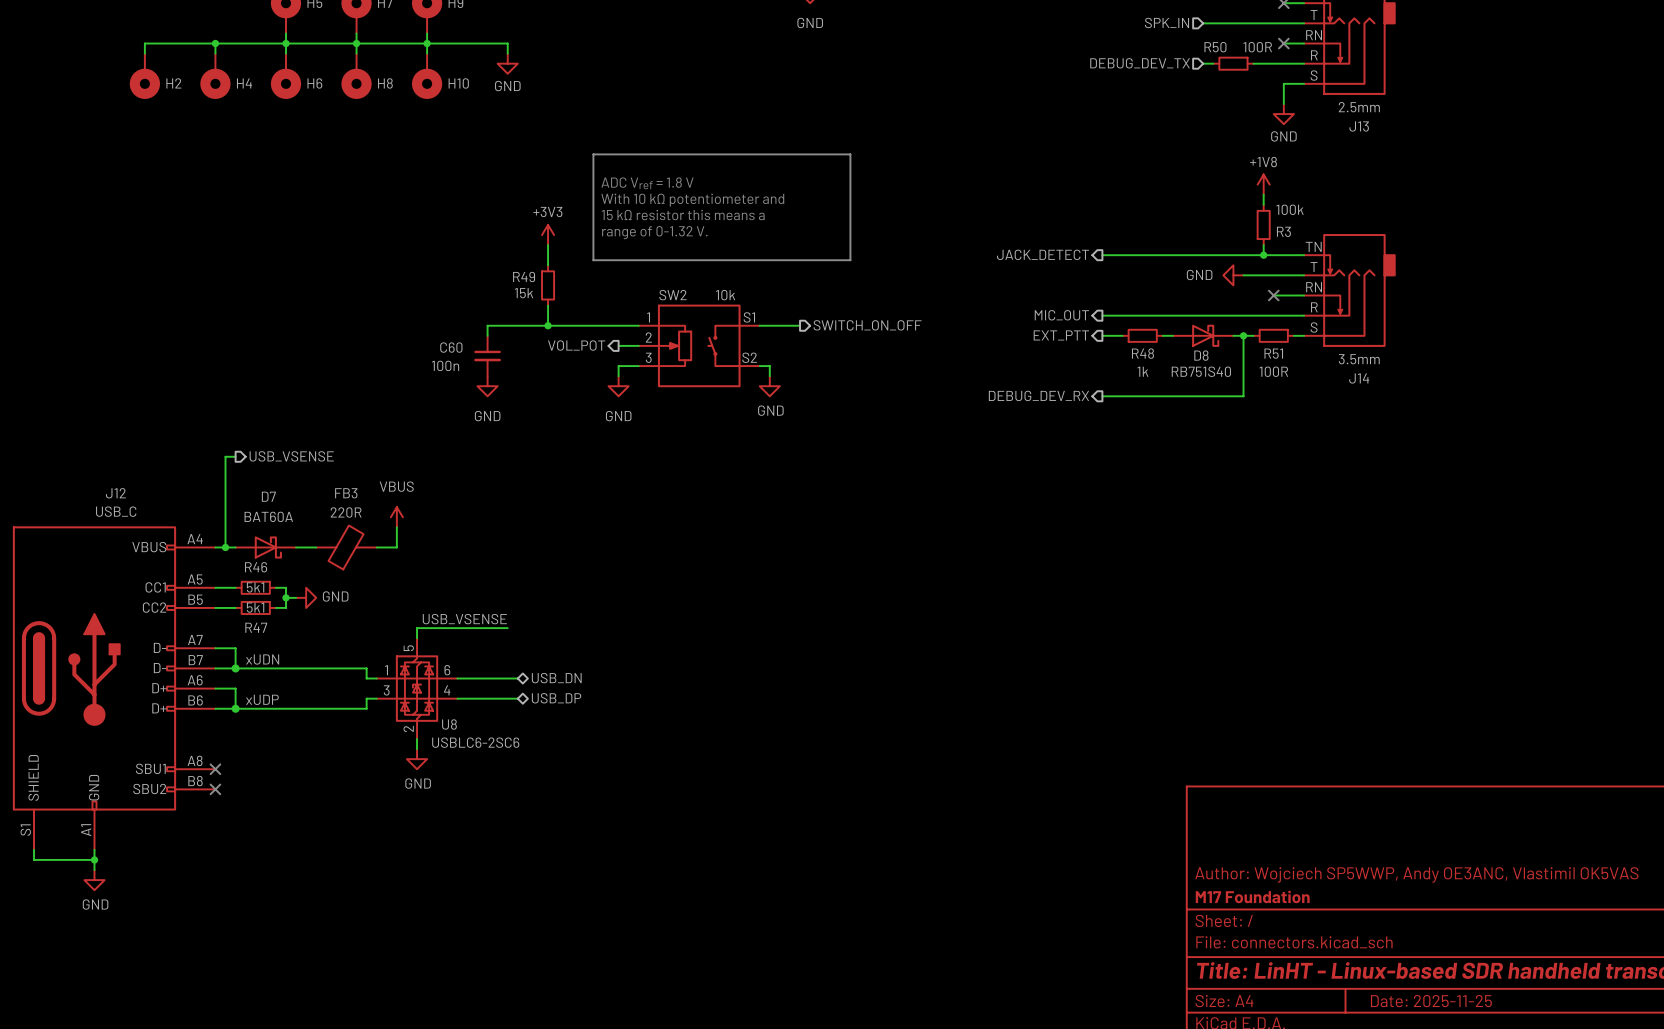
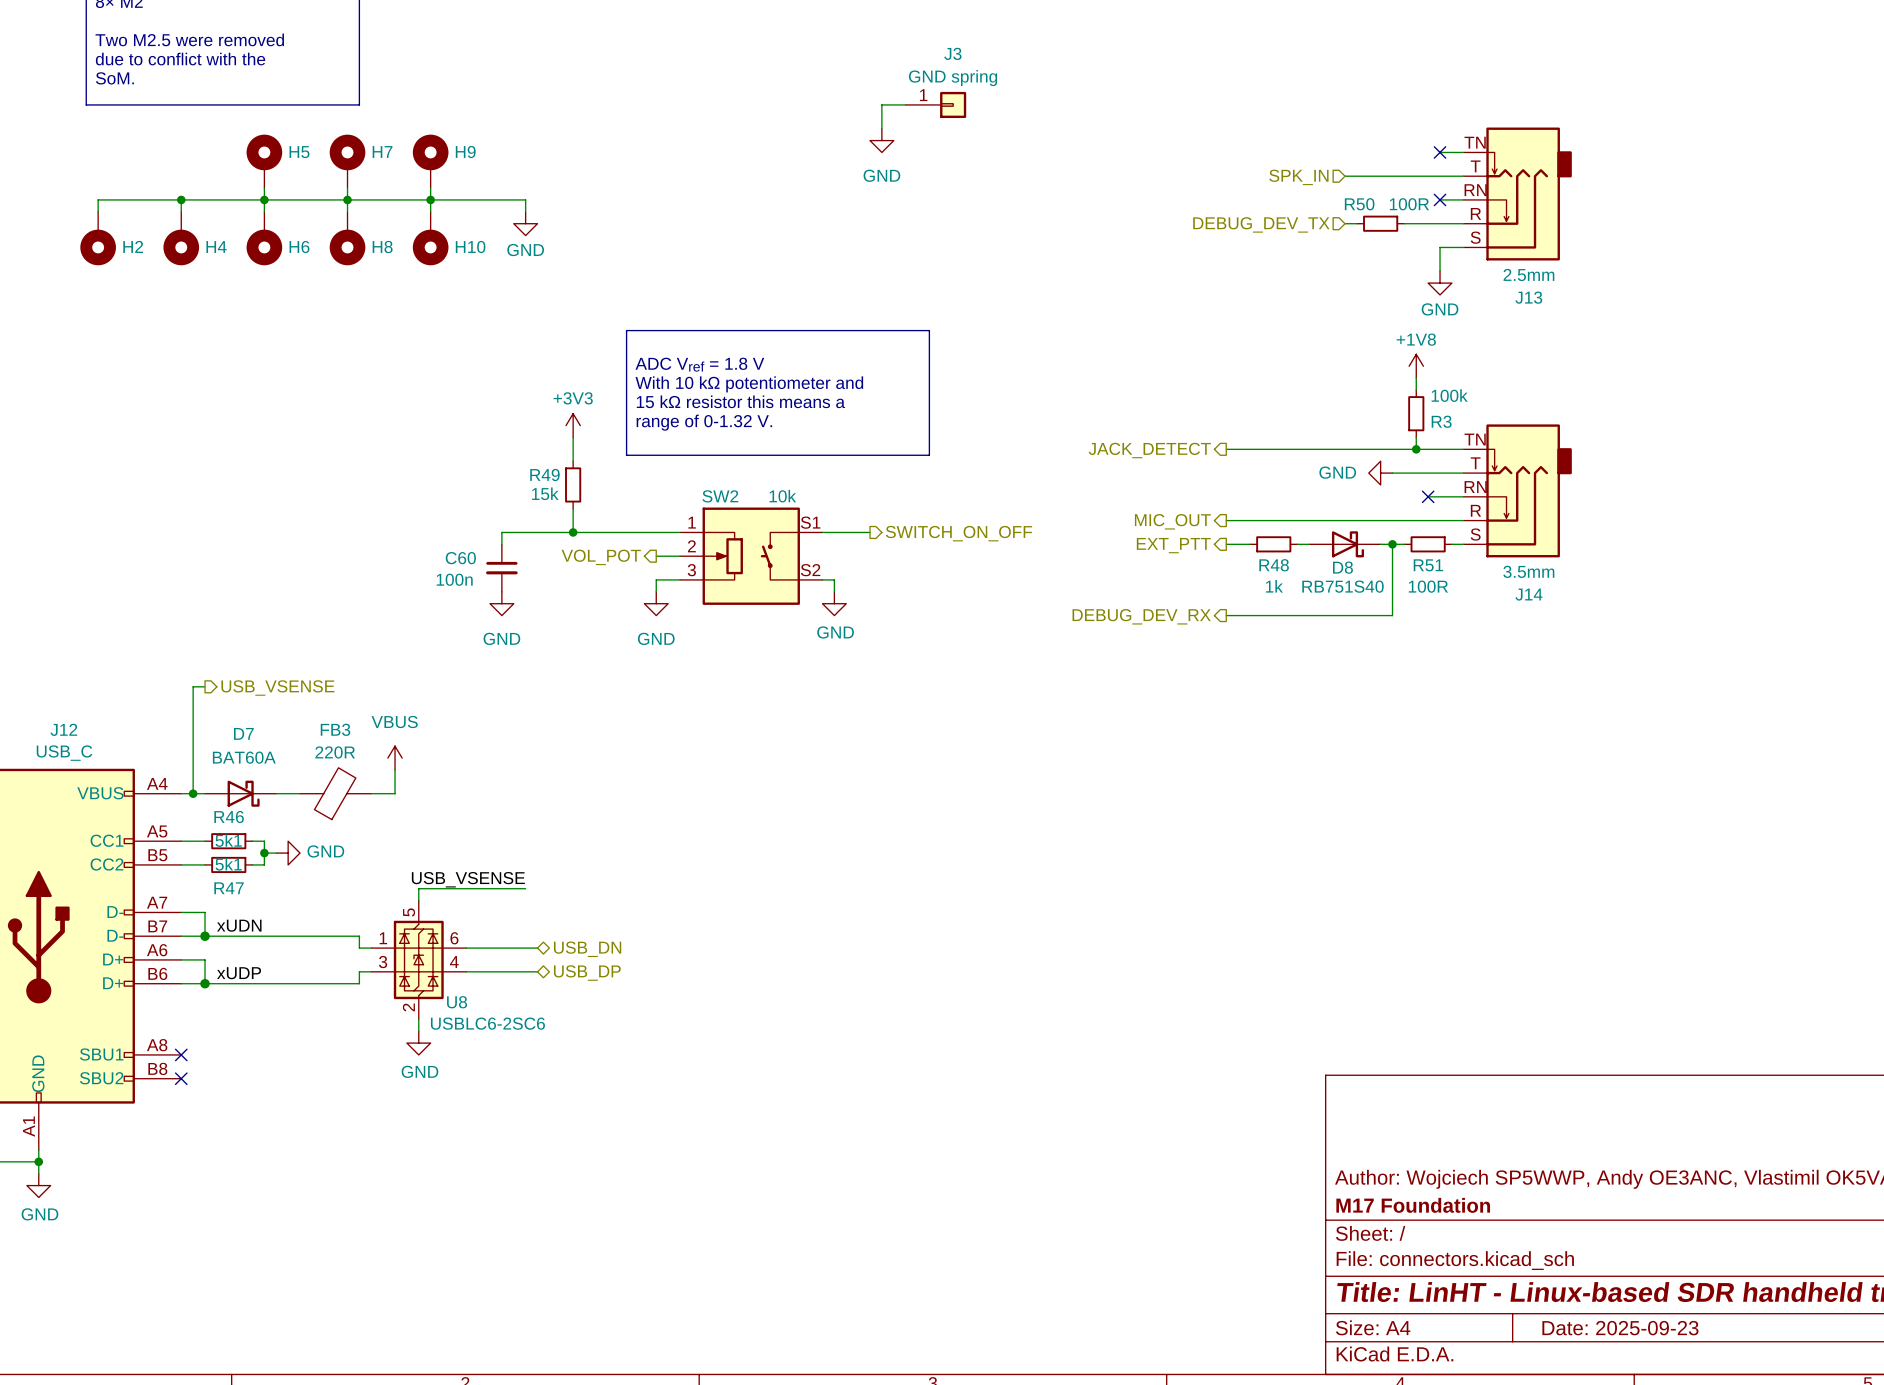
title block: Date: 2025-11-25 (1431, 1001) -> Date: 2025-09-23 (1620, 1328)

